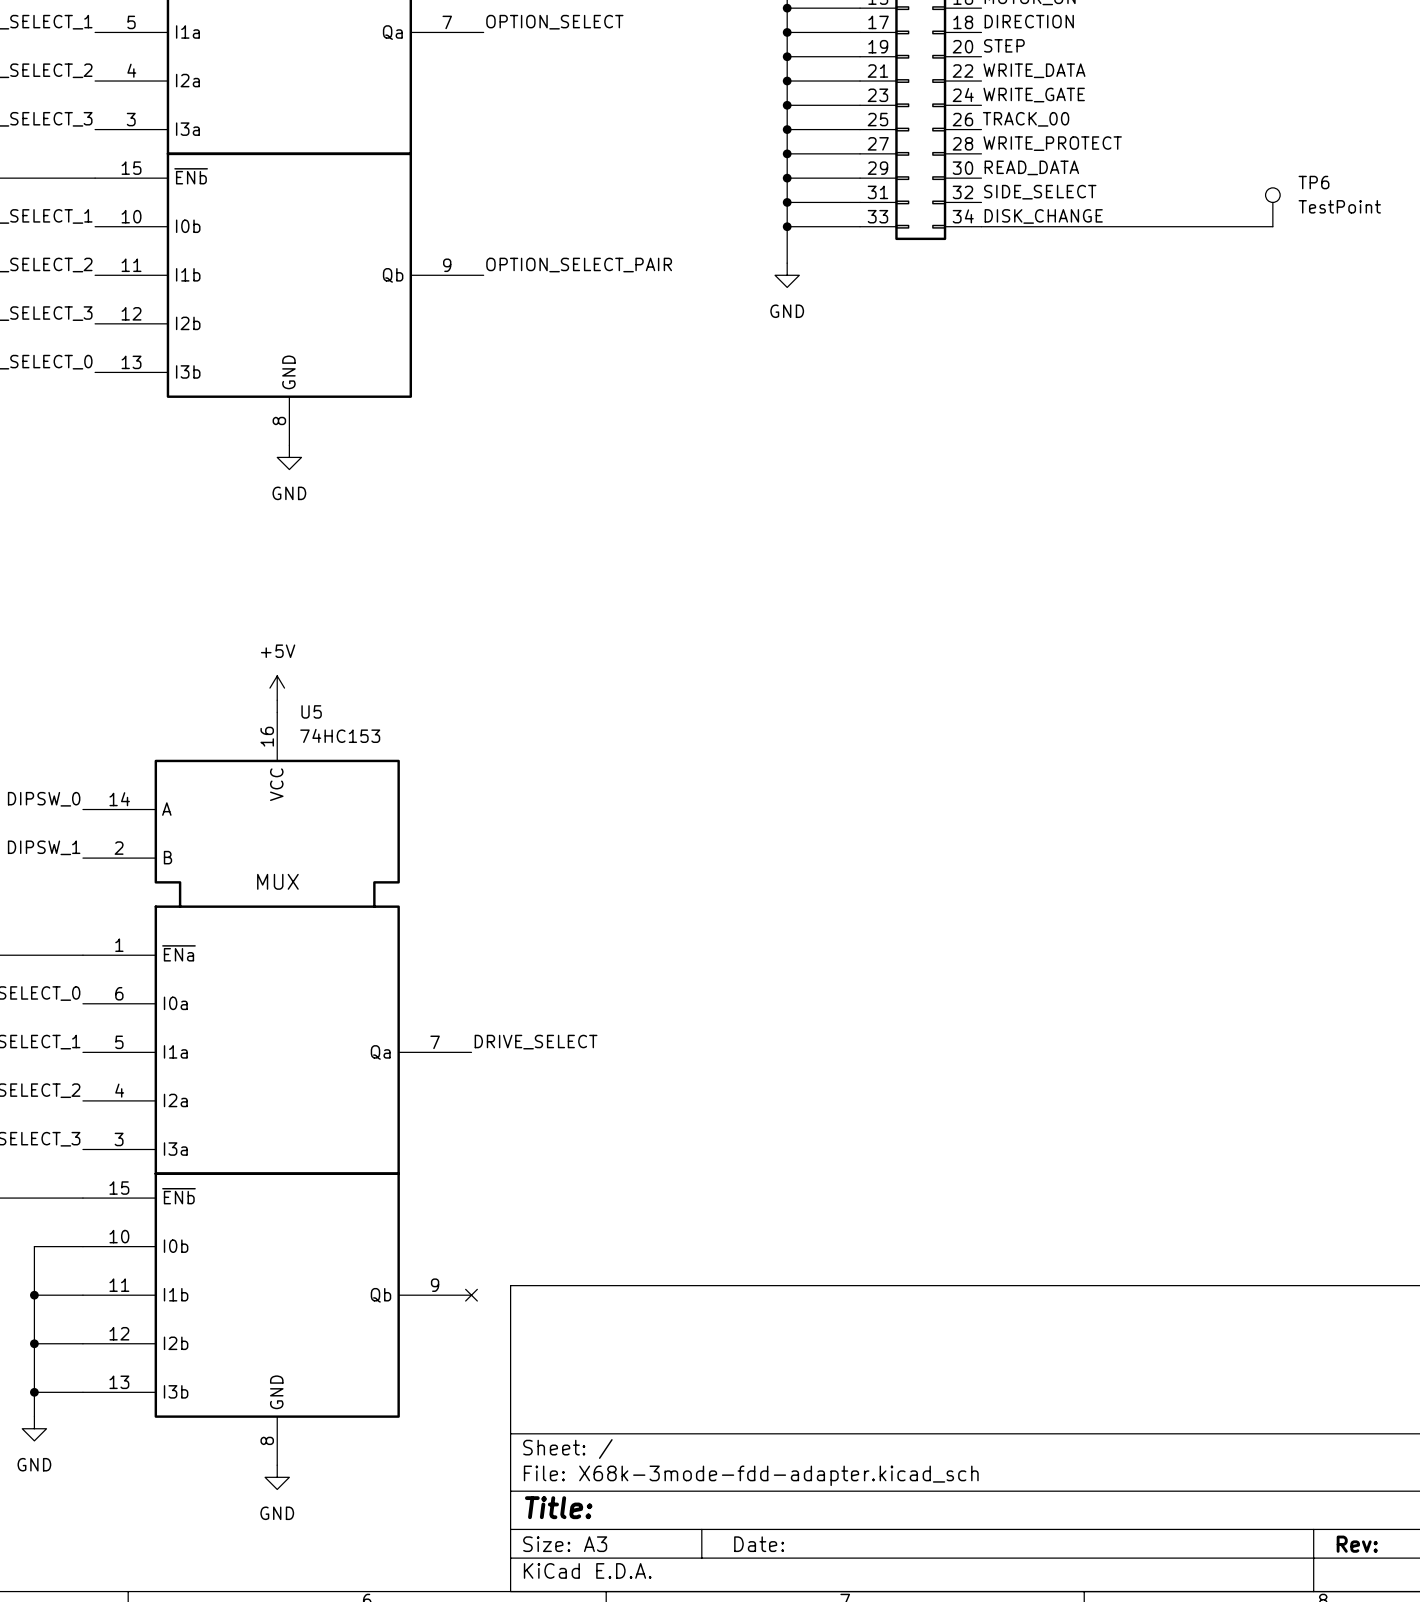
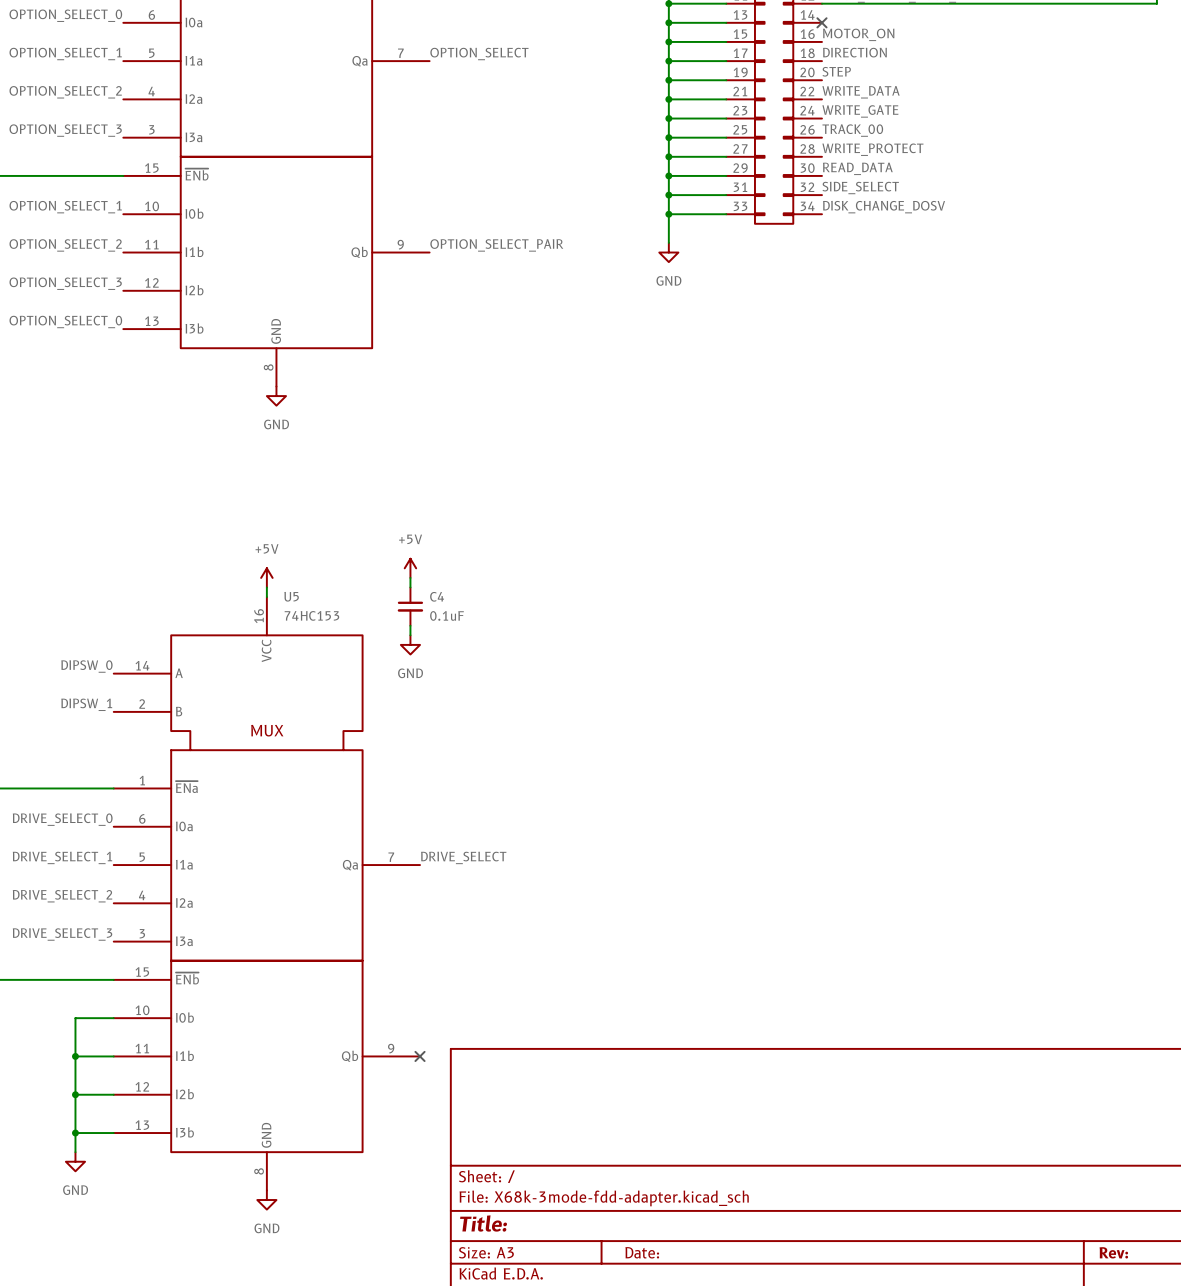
TP6: TestPoint (1272, 207) -> none
label: DISK_CHANGE (1043, 216) -> DISK_CHANGE_DOSV (884, 207)
wire: (981, 226) (1272, 226) -> none
power symbol: none -> +5V (410, 568)
wire: none -> (410, 577) (410, 587)
C4: none -> 0.1uF (410, 606)
wire: none -> (410, 625) (410, 635)
power symbol: none -> GND (410, 644)

